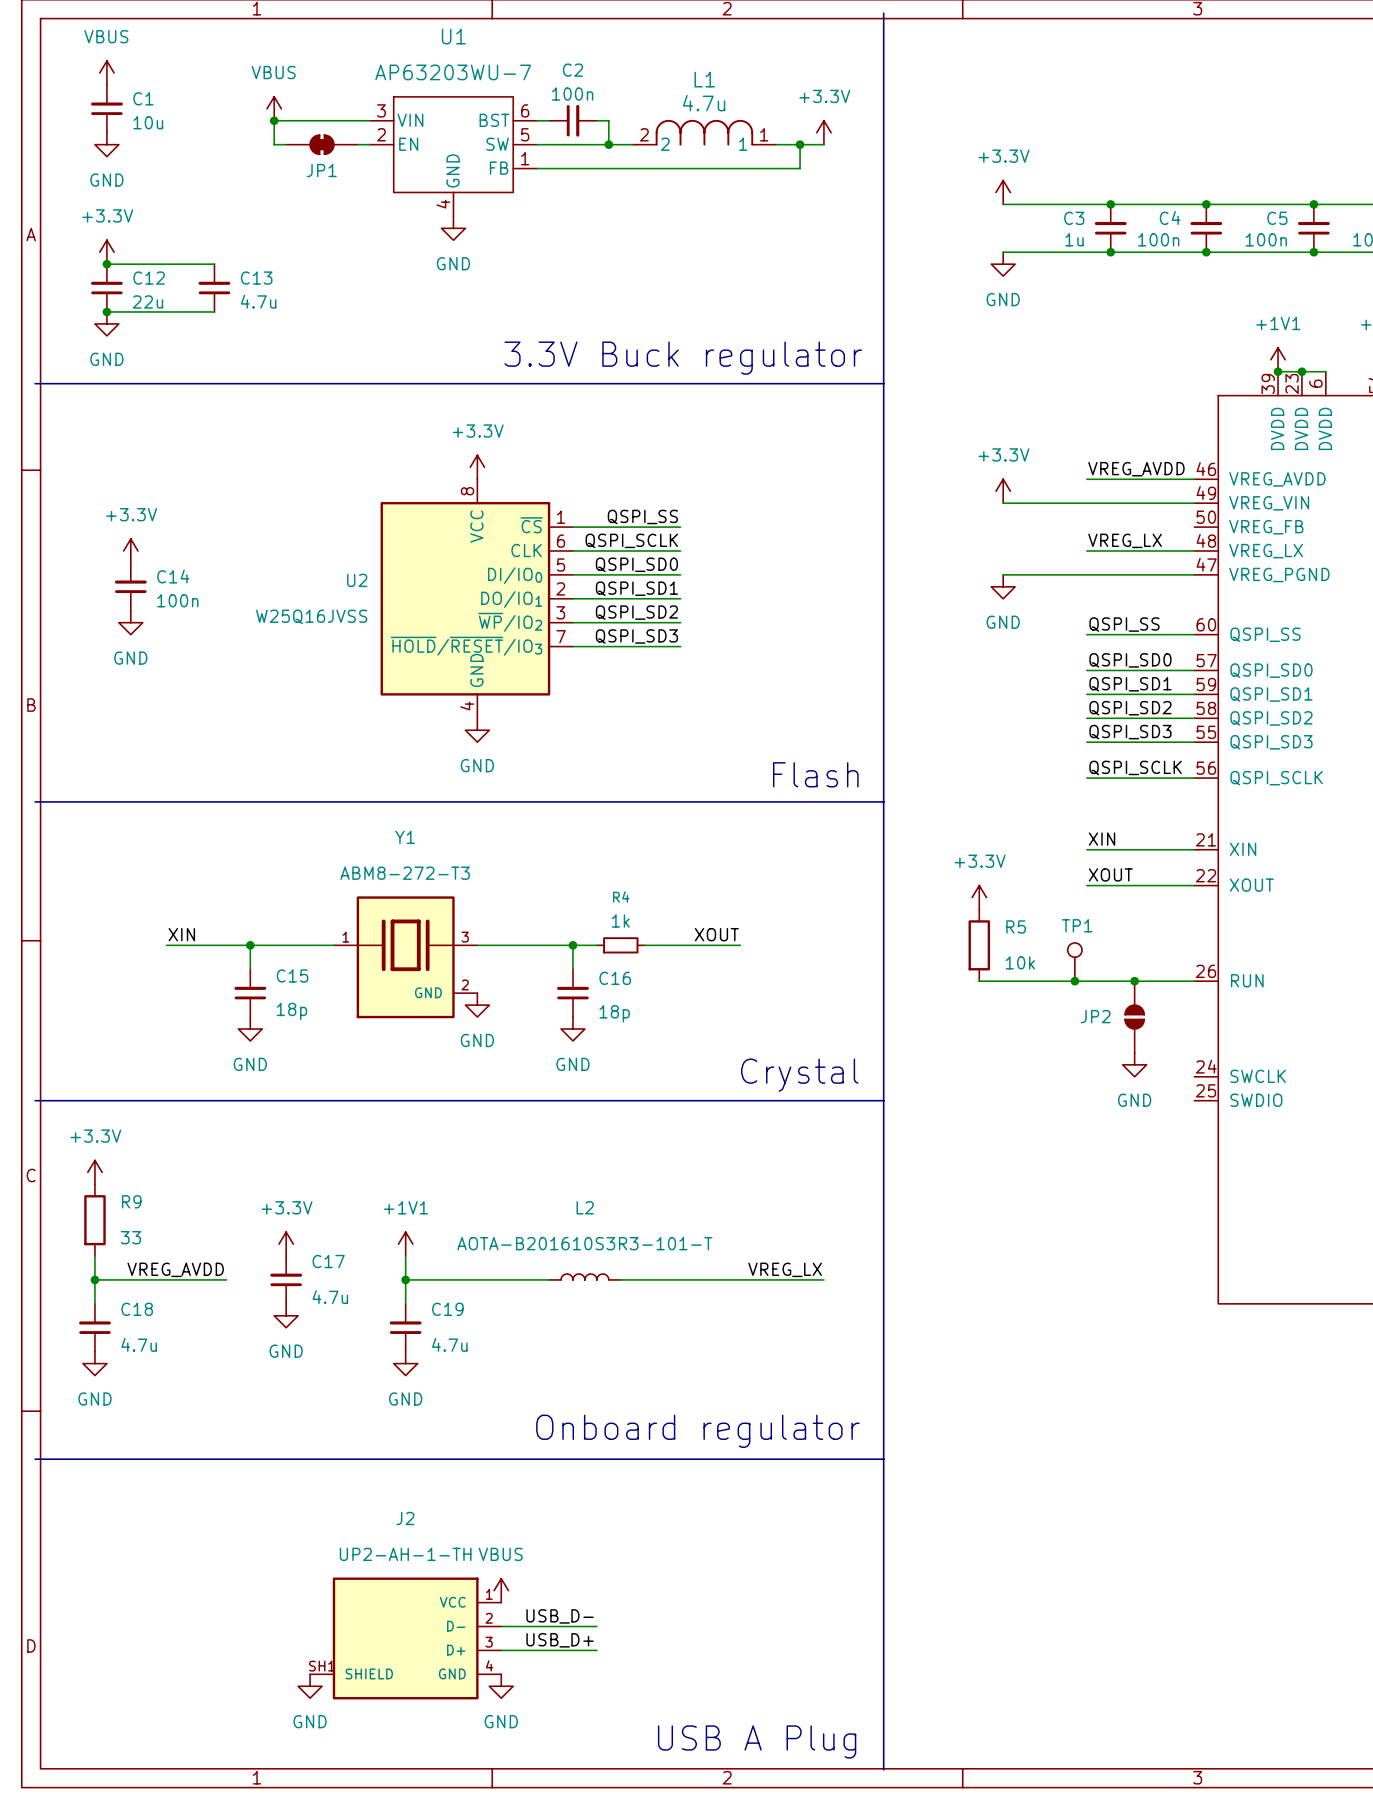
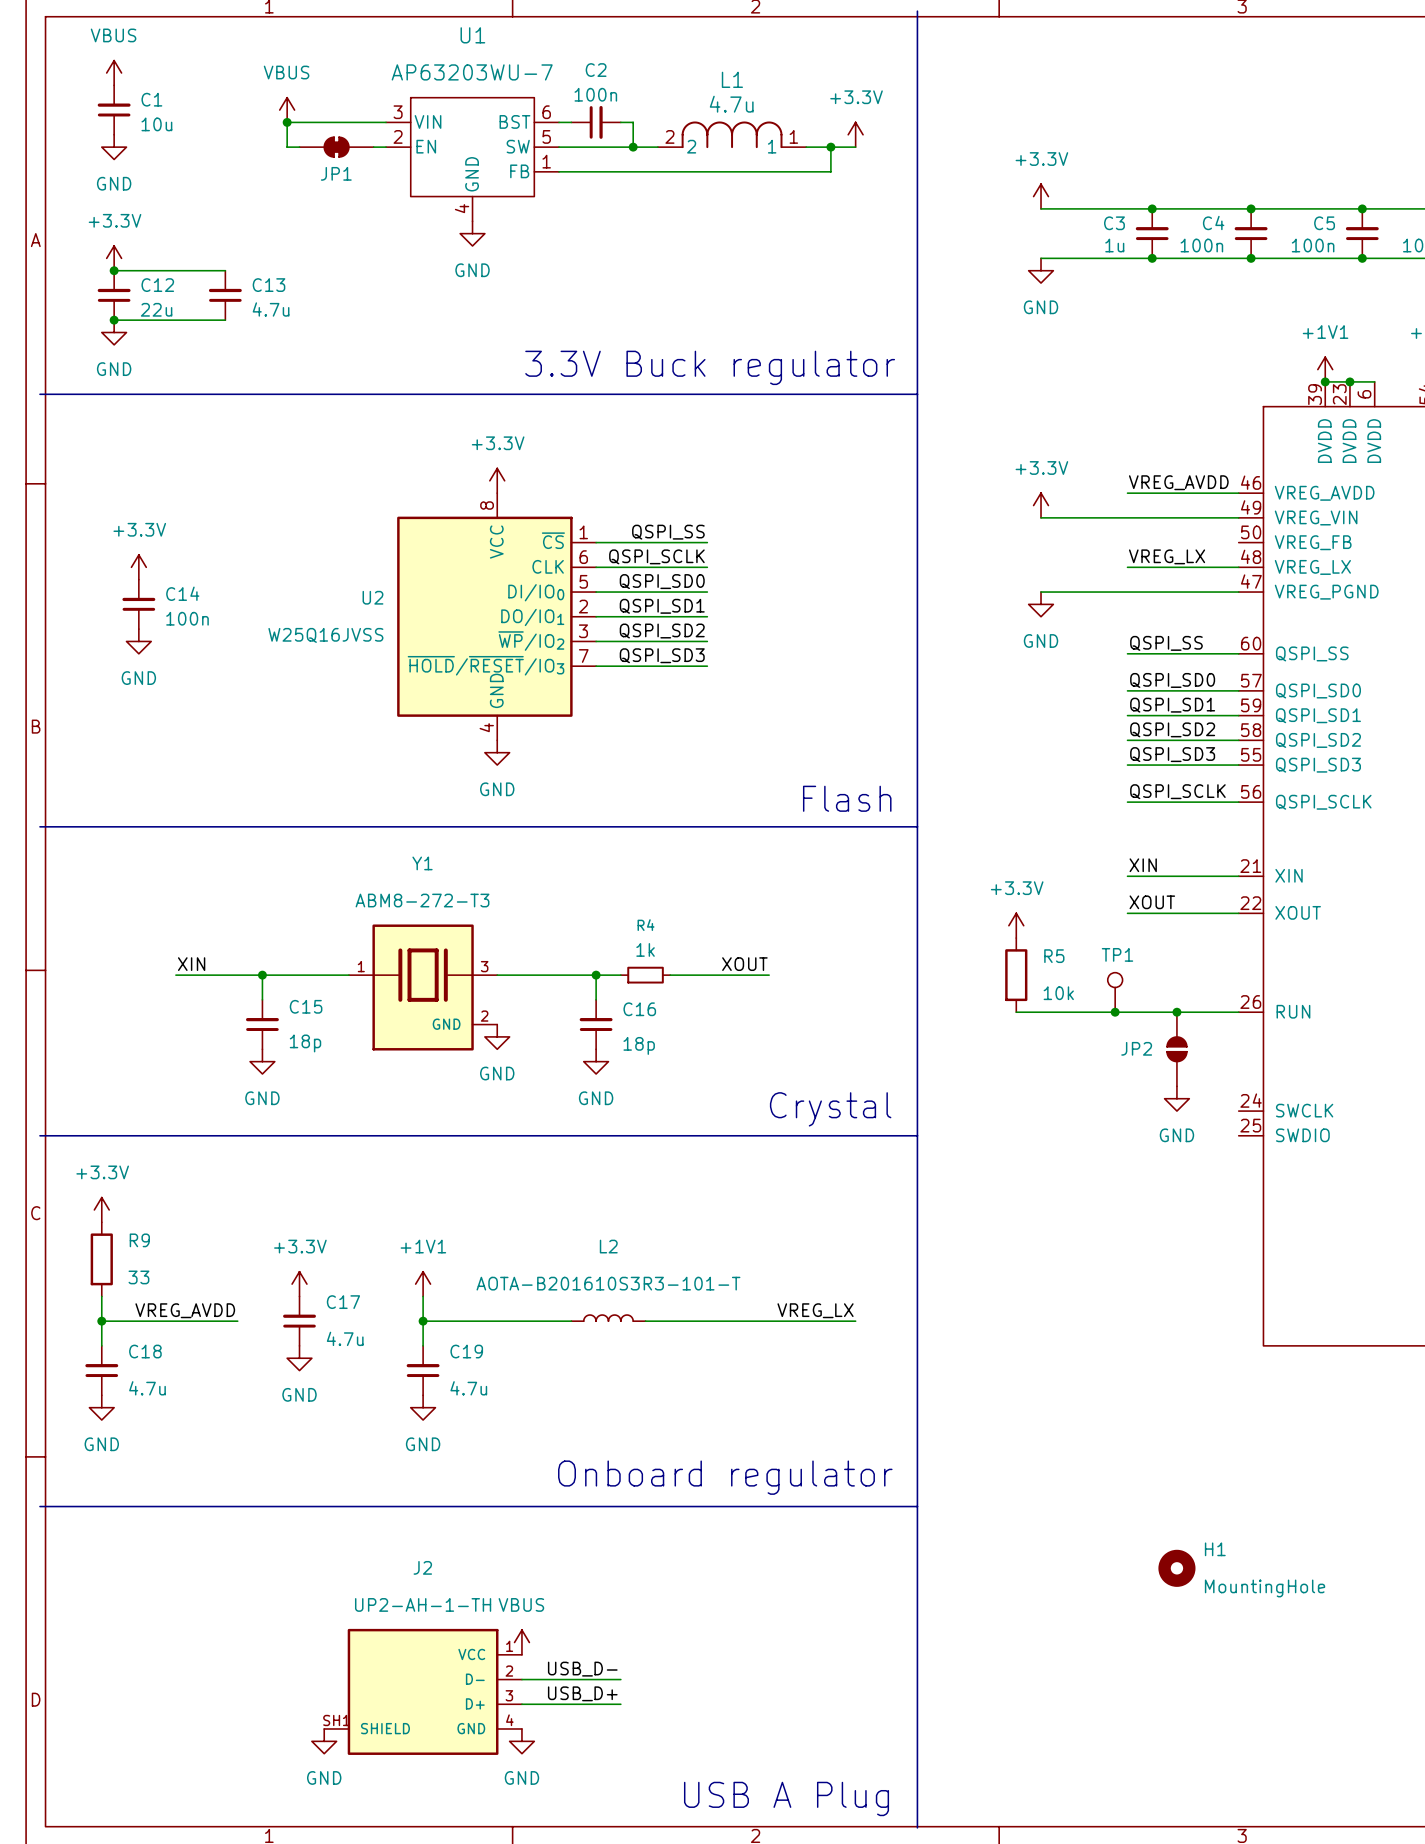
H1: none -> MountingHole (1176, 1568)

